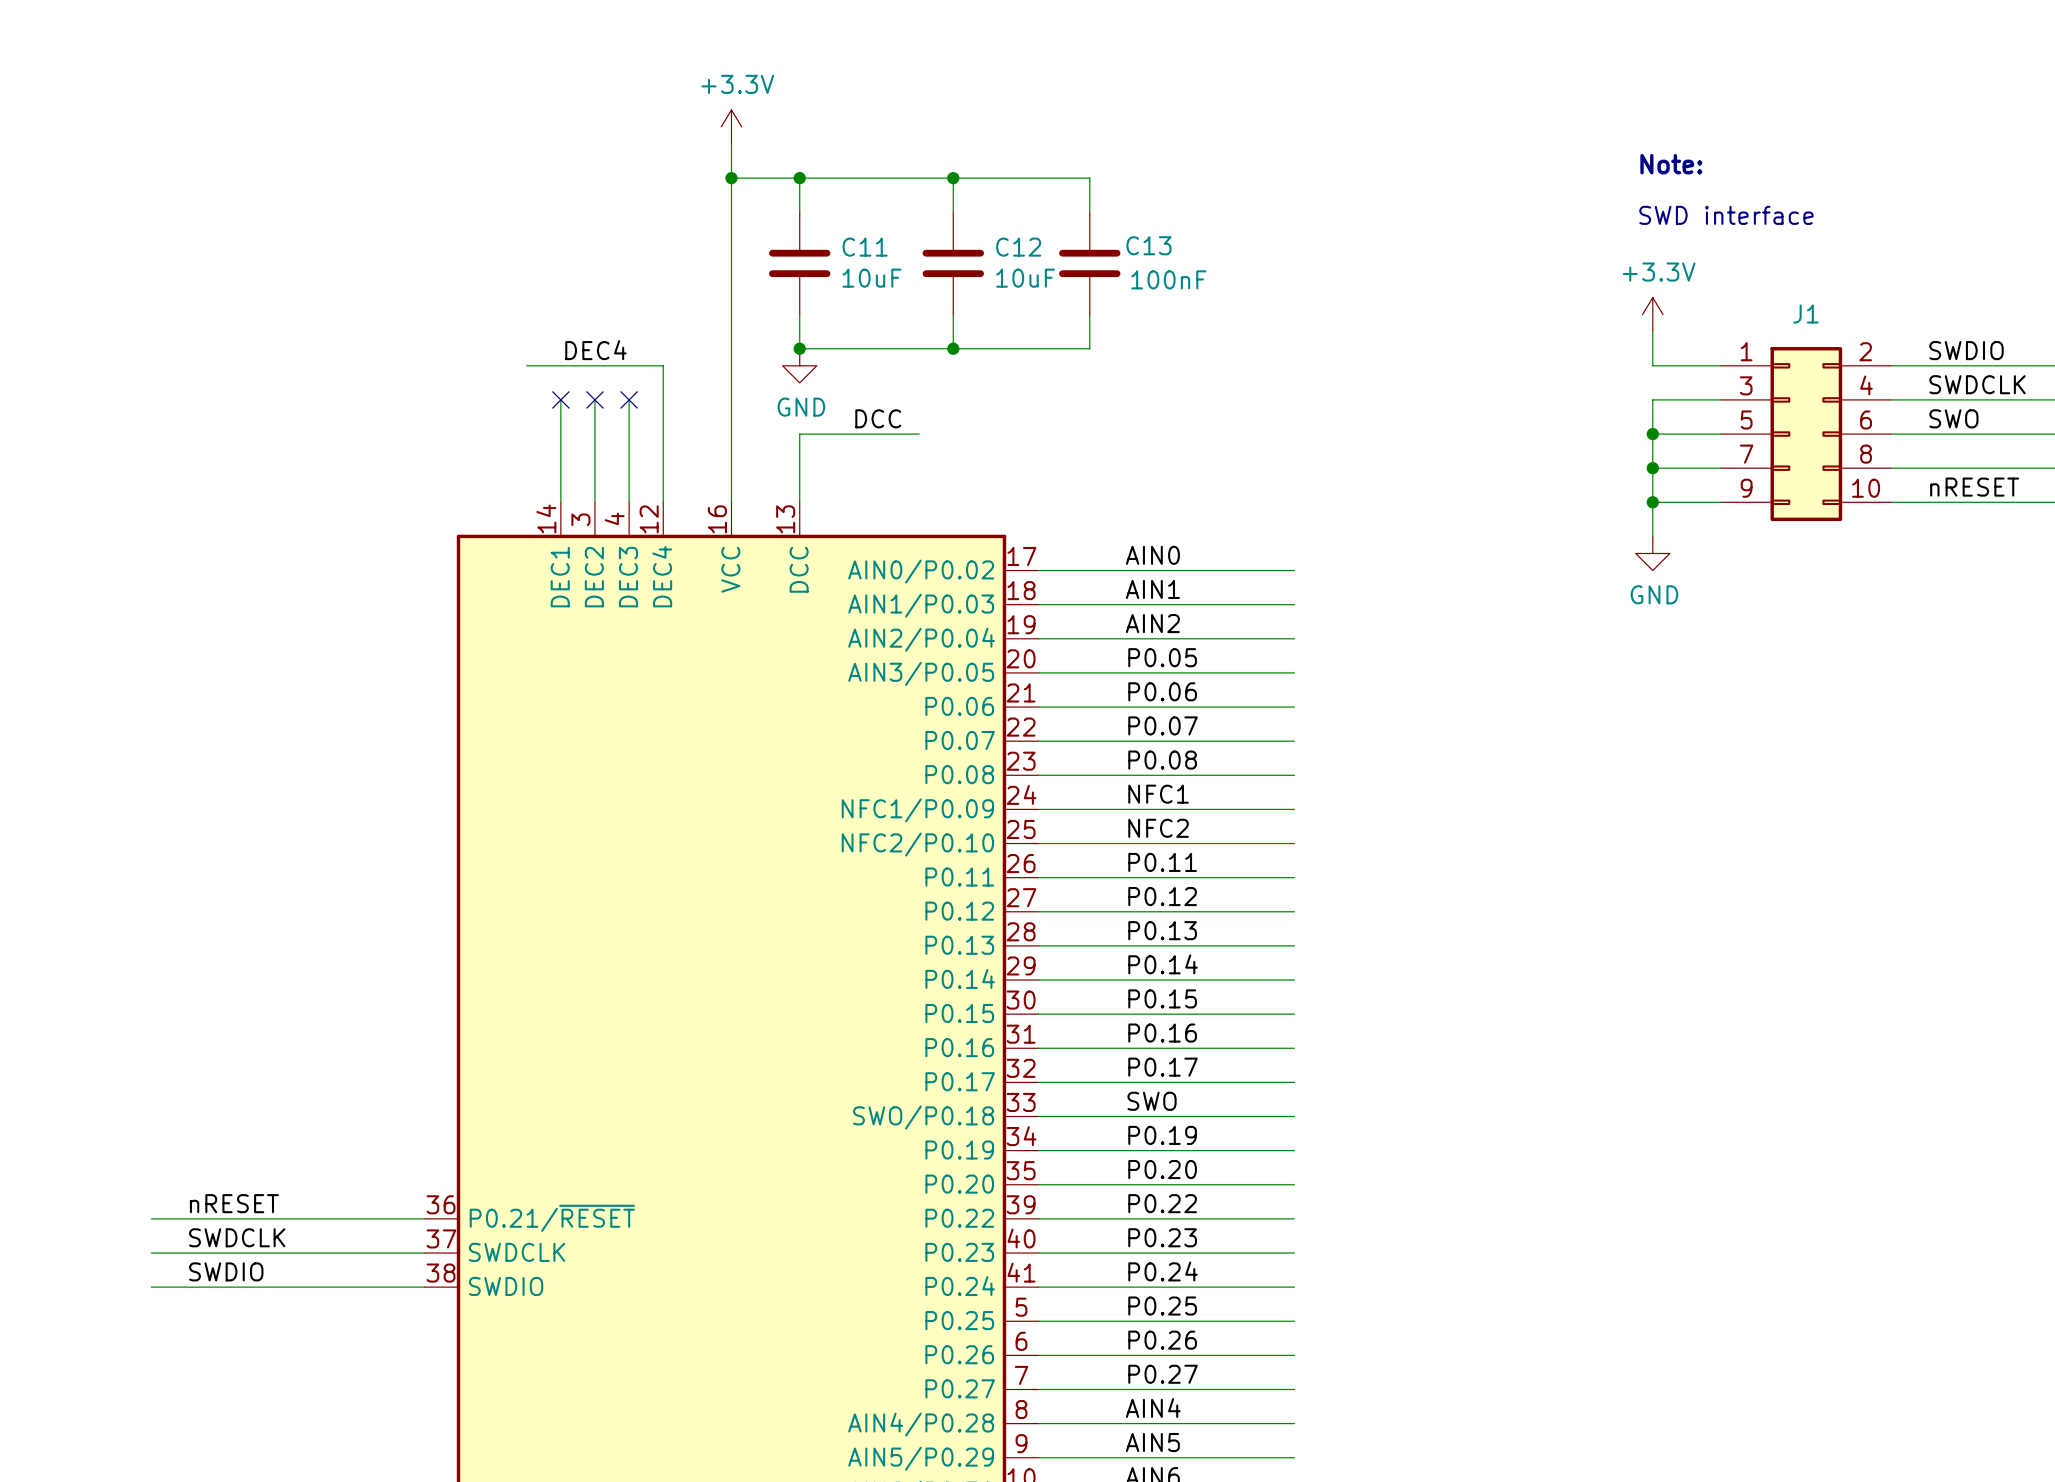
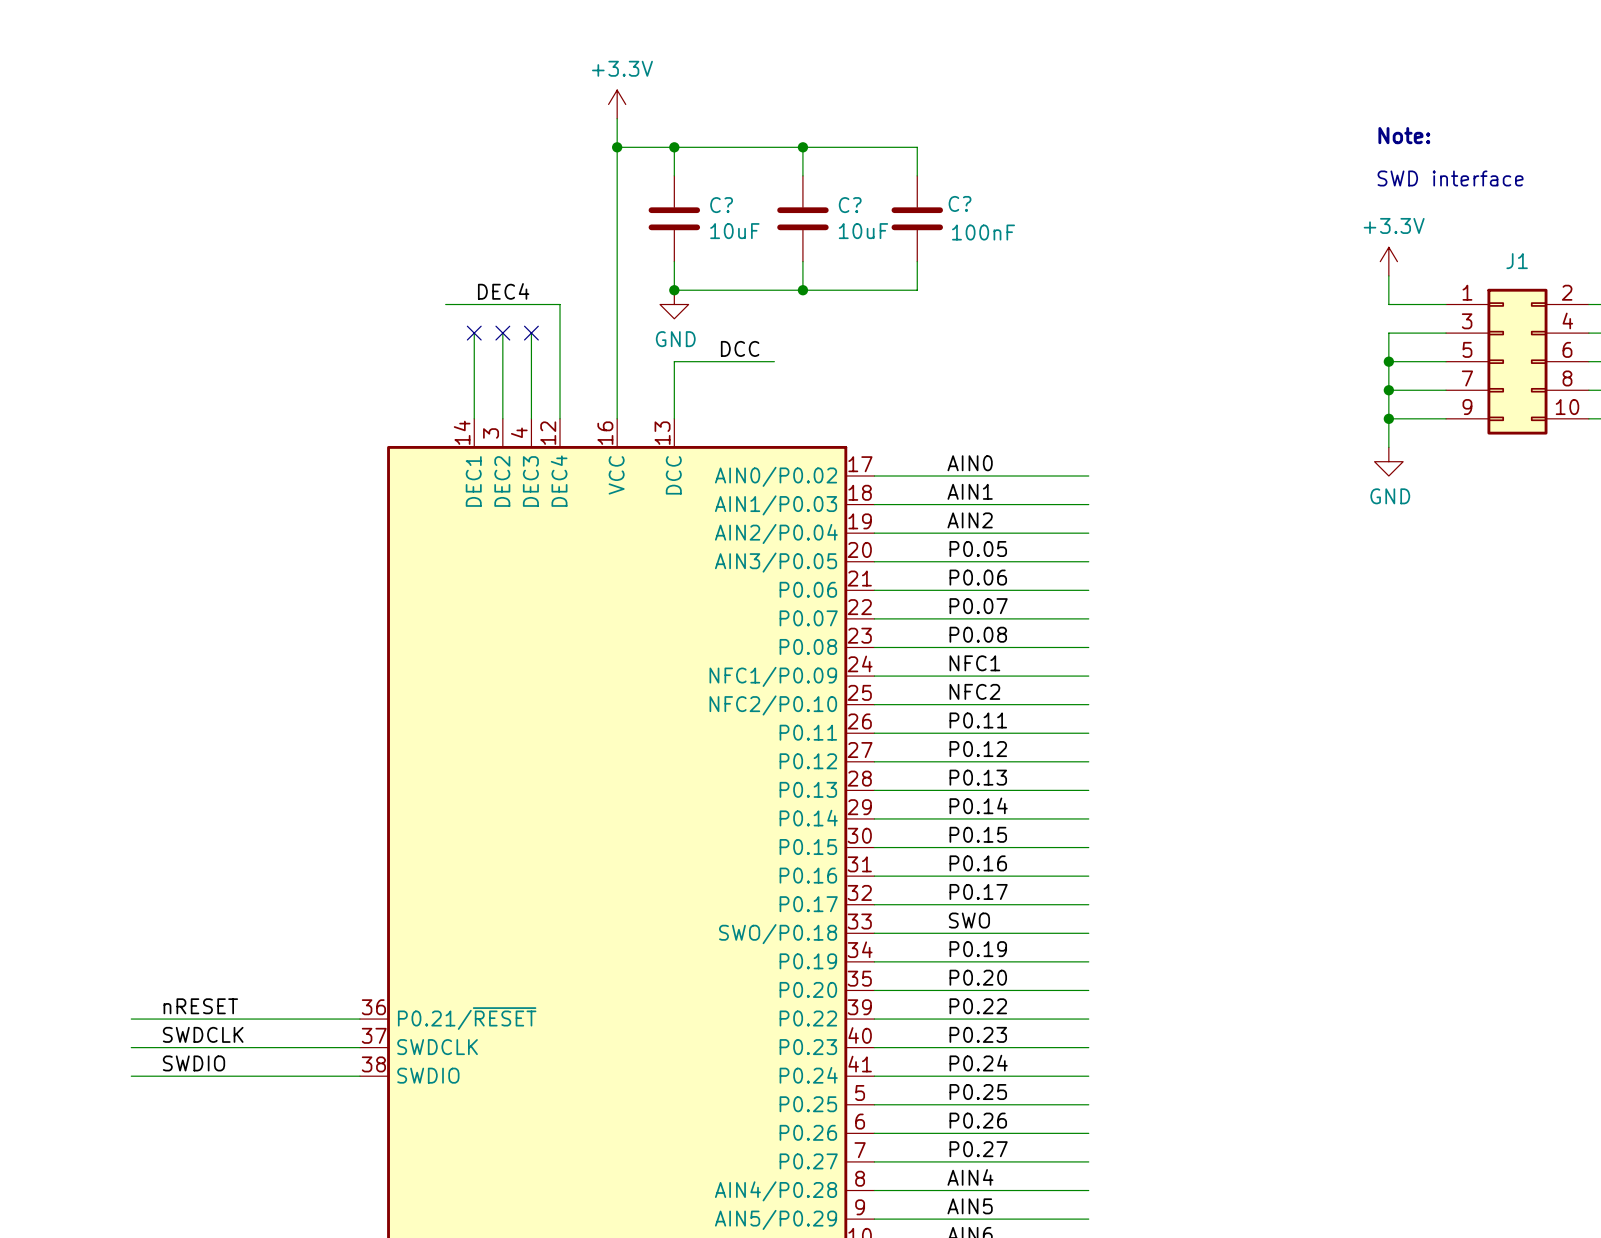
C13 name: C13 (1148, 245) -> C? (960, 203)
C11 name: C11 (865, 247) -> C? (721, 205)
C12 name: C12 (1018, 247) -> C? (850, 205)

